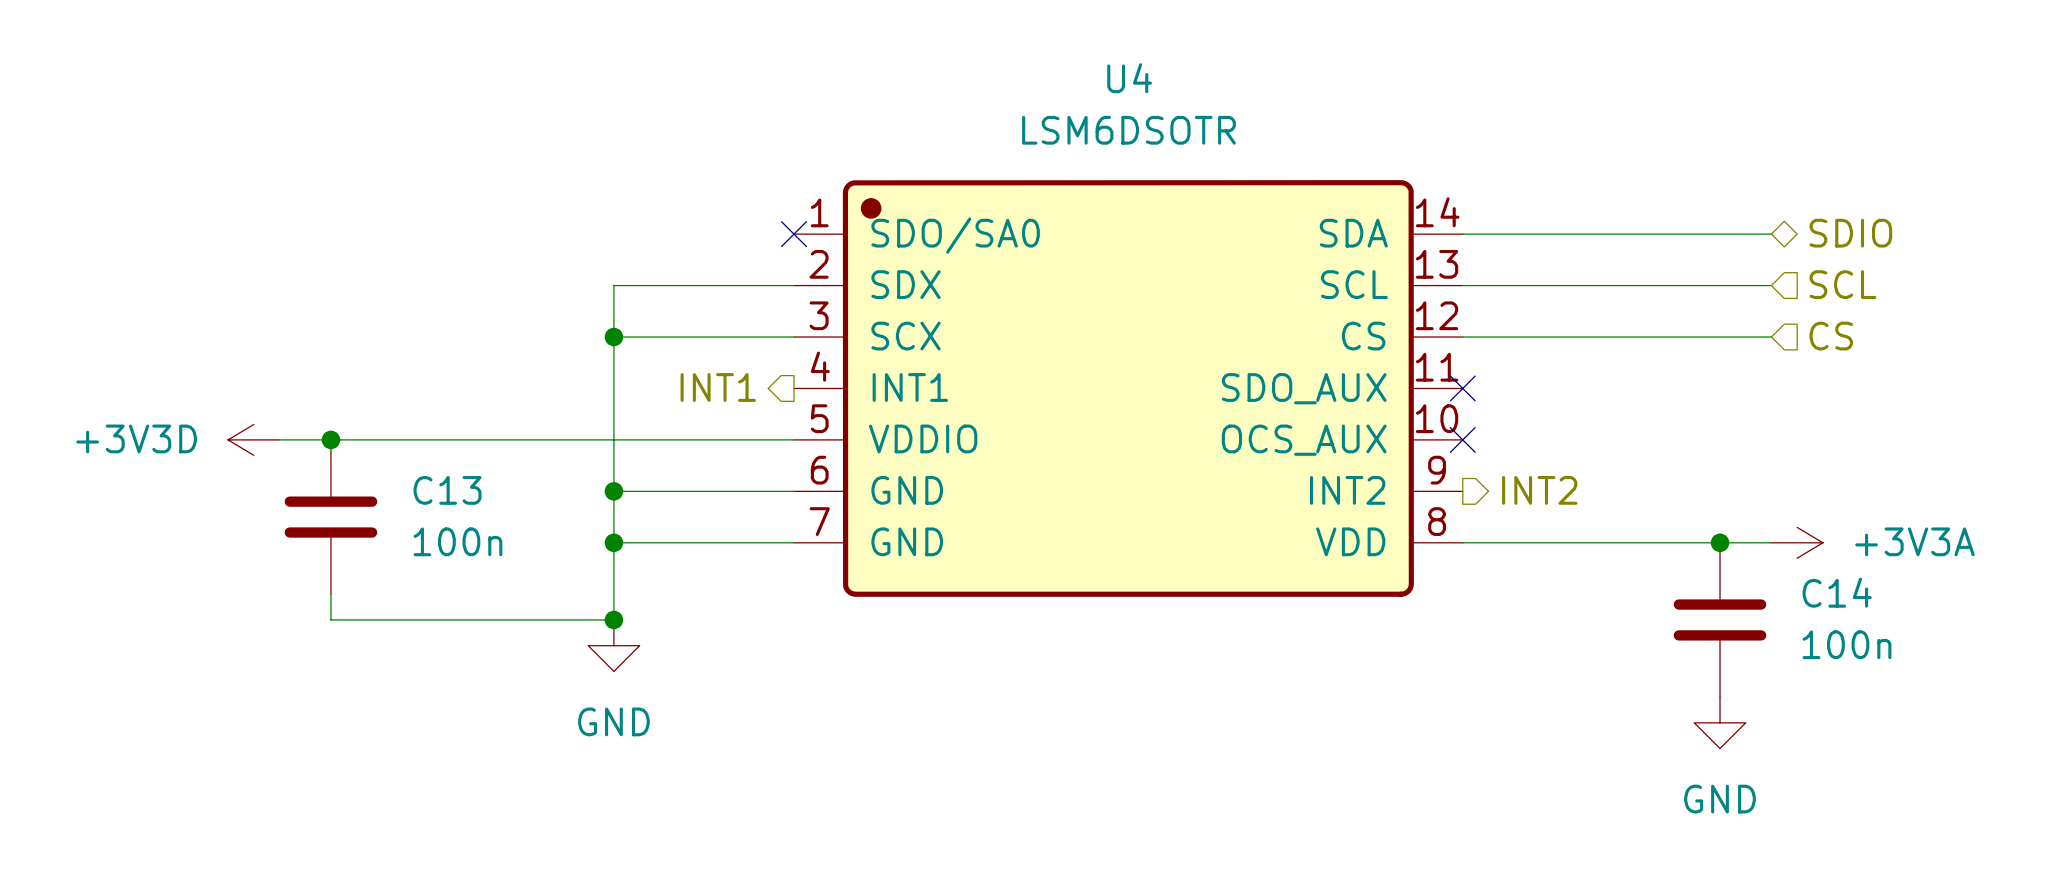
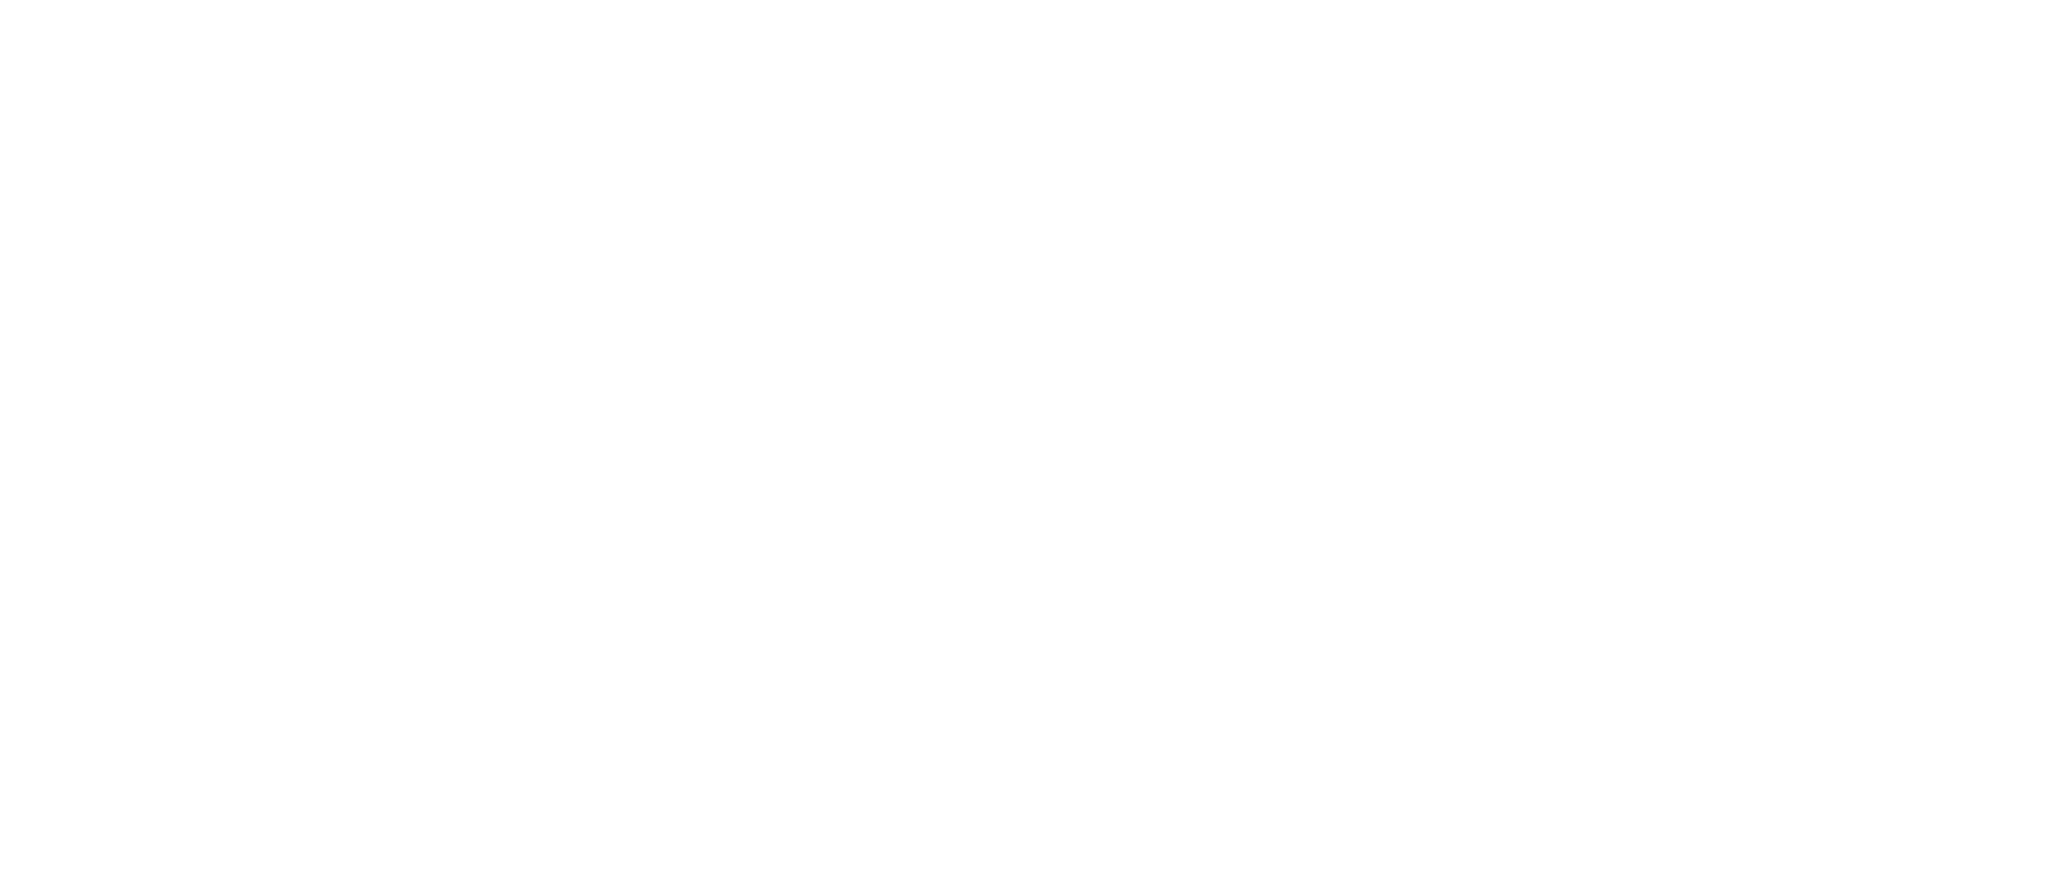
hierarchical label: SDIO (1850, 233) -> none
no-connect mark: (793, 234) -> none
wire: (1462, 234) (1771, 234) -> none
hierarchical label: SCL (1842, 284) -> none
wire: (793, 285) (613, 285) (613, 619) (330, 619) (330, 594) -> none
wire: (1462, 285) (1771, 285) -> none
hierarchical label: CS (1831, 336) -> none
wire: (613, 337) (793, 337) -> none
junction: (613, 337) -> none
wire: (1462, 337) (1771, 337) -> none
hierarchical label: INT1 (718, 387) -> none
U4: LSM6DSOTR (1128, 388) -> none
no-connect mark: (1462, 388) -> none
power symbol: +3V3D (253, 439) -> none
wire: (279, 439) (793, 439) -> none
junction: (330, 439) -> none
no-connect mark: (1462, 439) -> none
hierarchical label: INT2 (1539, 490) -> none
wire: (613, 491) (793, 491) -> none
junction: (613, 491) -> none
C13: 100n (330, 517) -> none
wire: (613, 542) (793, 542) -> none
junction: (613, 542) -> none
wire: (1462, 542) (1771, 542) -> none
junction: (1720, 542) -> none
power symbol: +3V3A (1797, 542) -> none
junction: (613, 619) -> none
C14: 100n (1720, 619) -> none
power symbol: GND (613, 645) -> none
power symbol: GND (1720, 722) -> none

